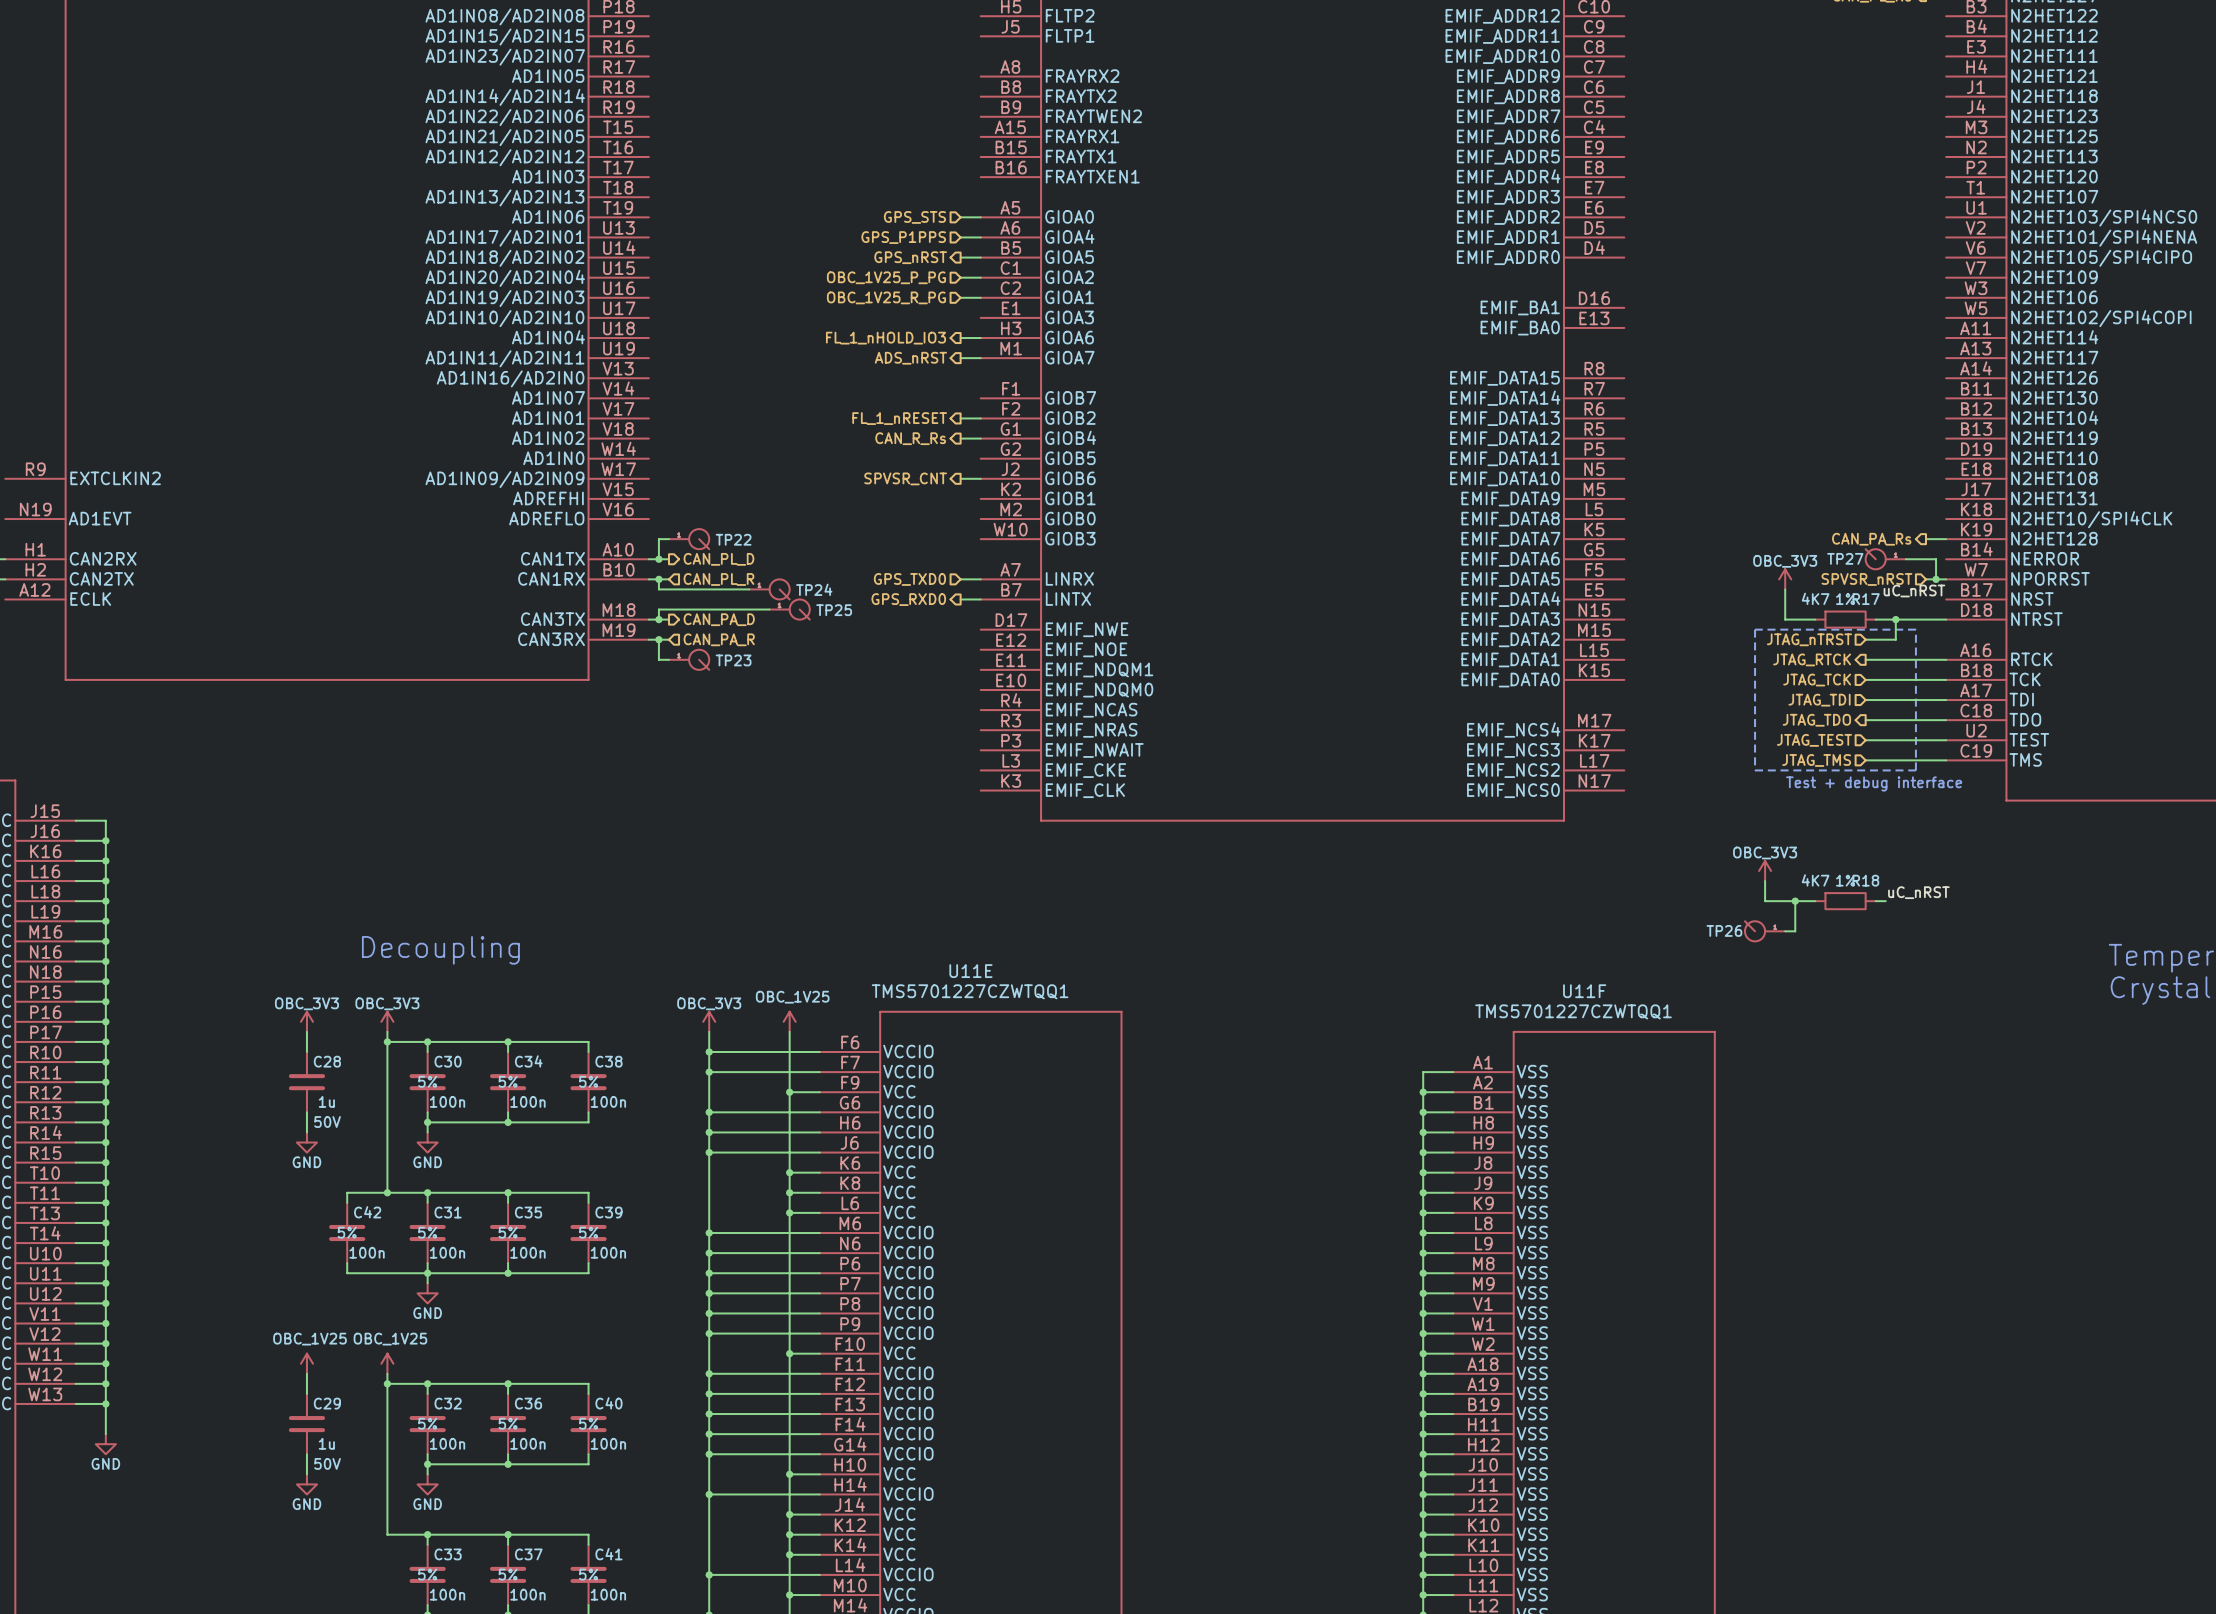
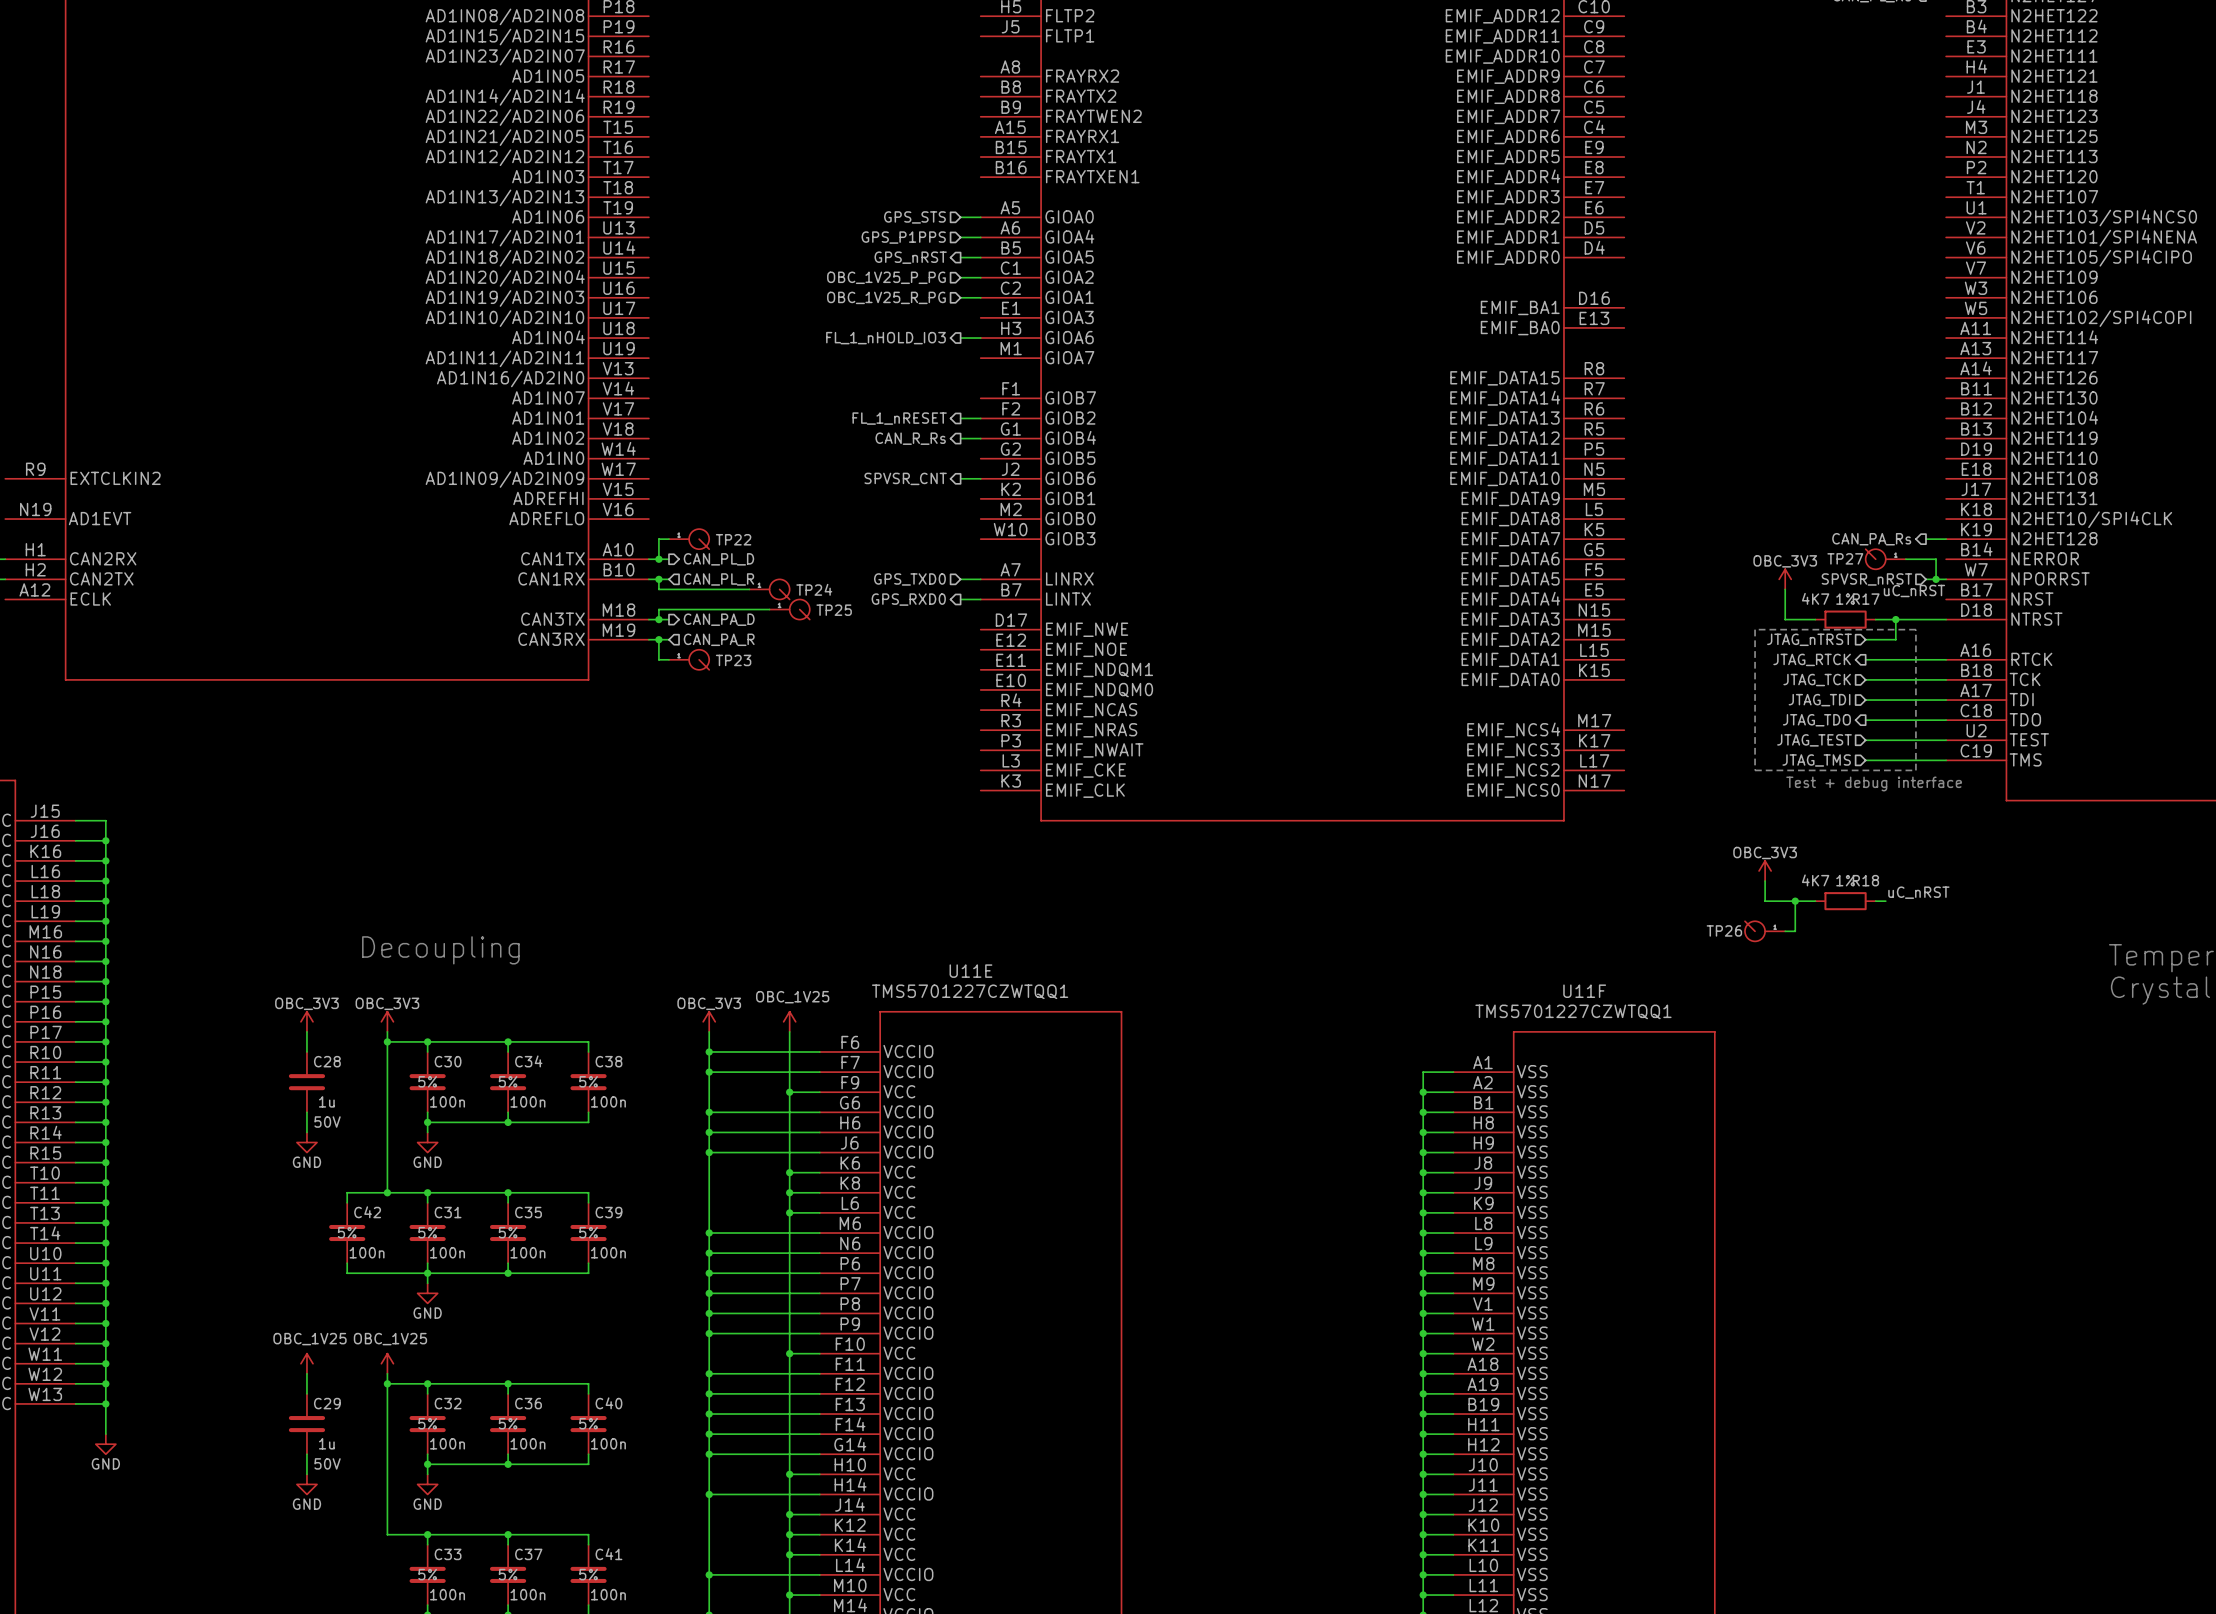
hierarchical label: ADS_nRST (910, 358) -> none
wire: (960, 358) (980, 358) -> none

